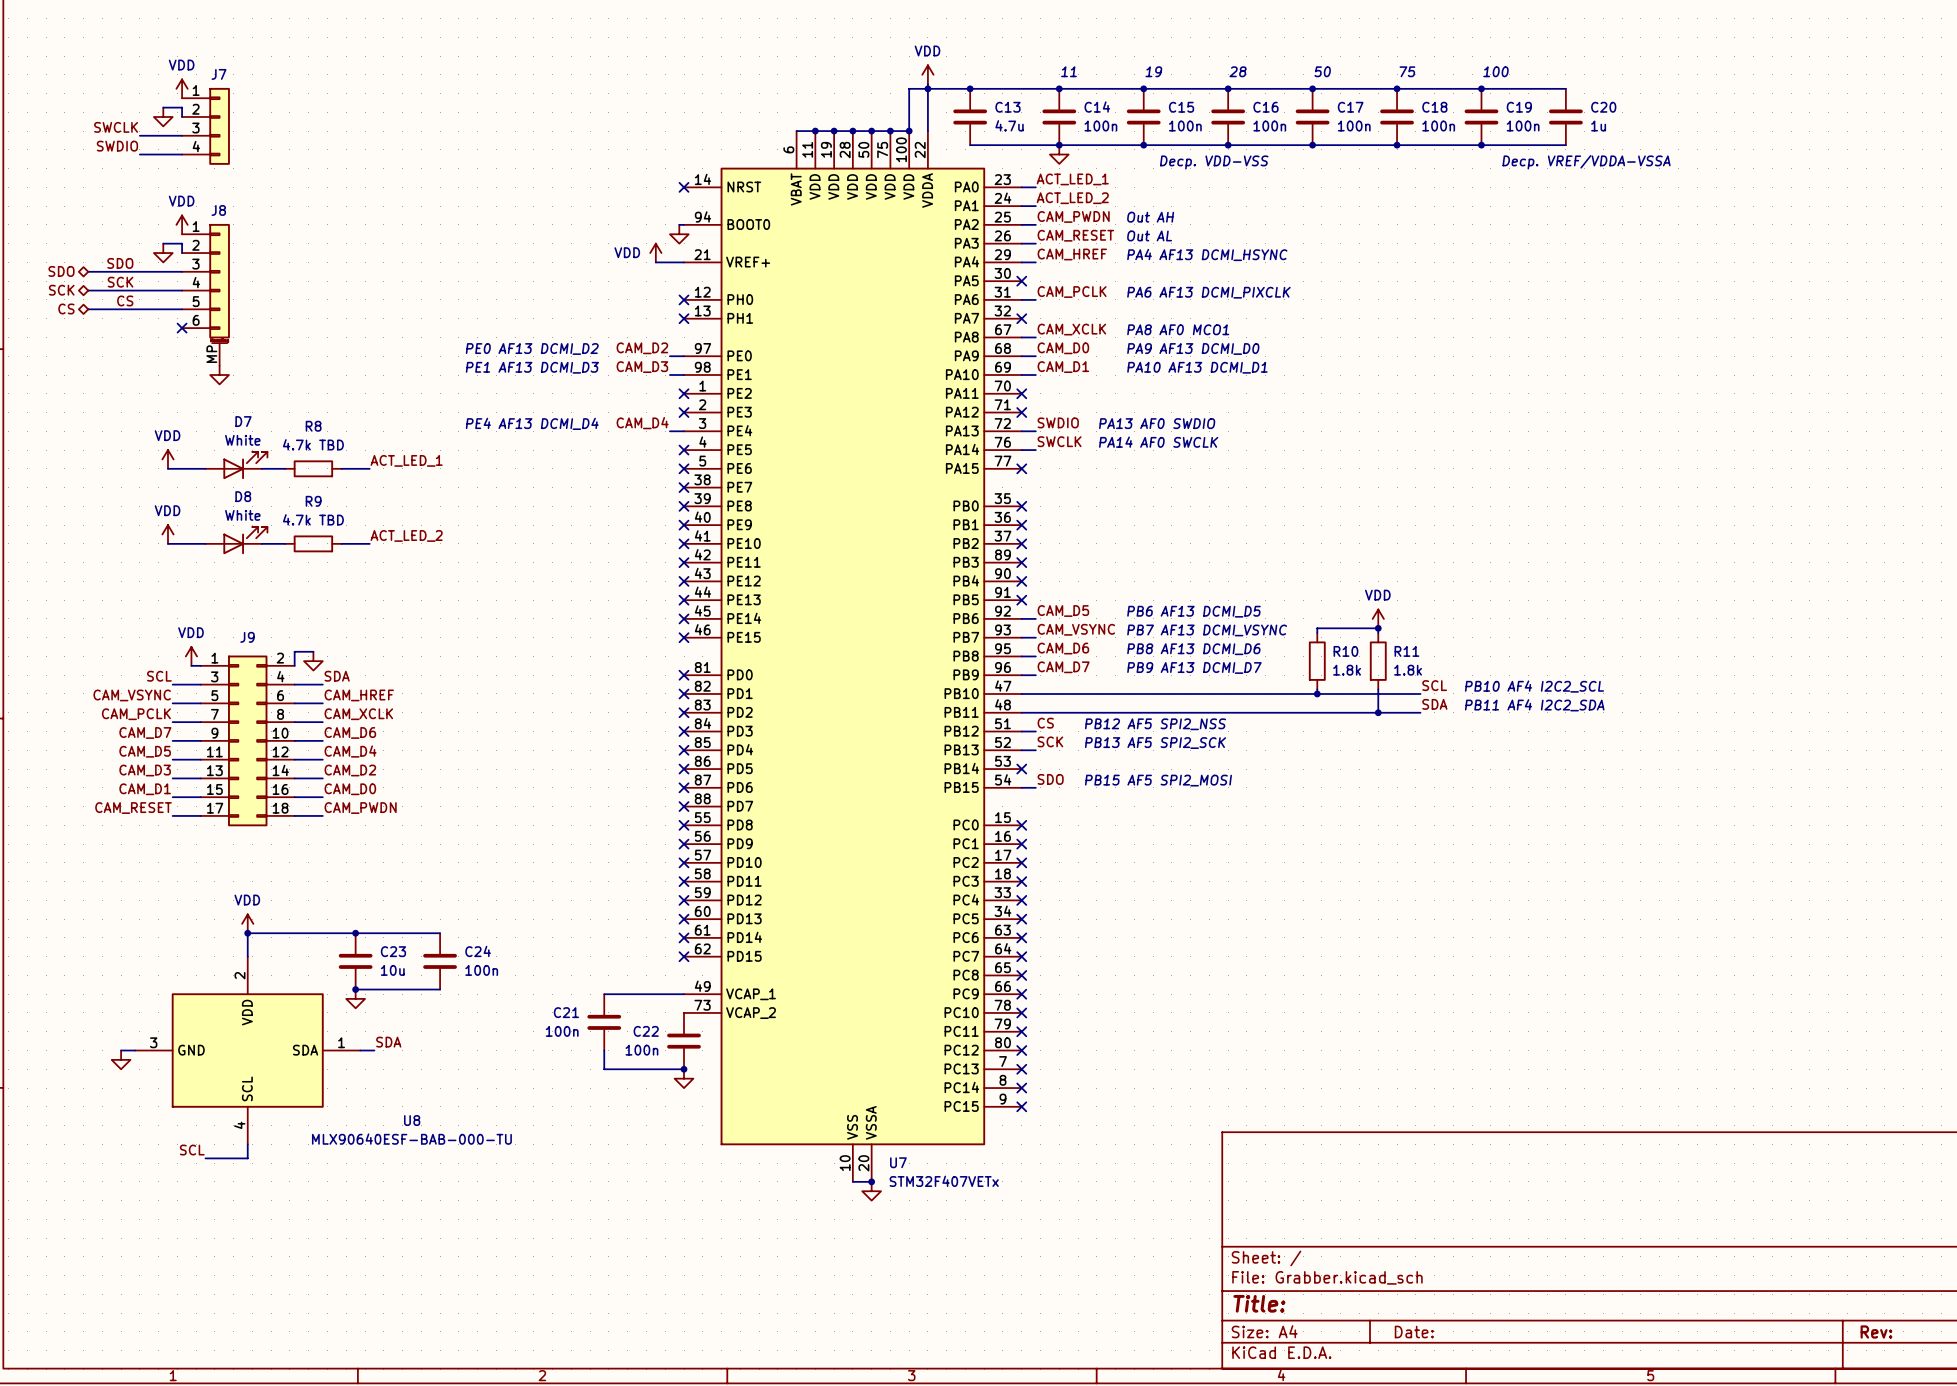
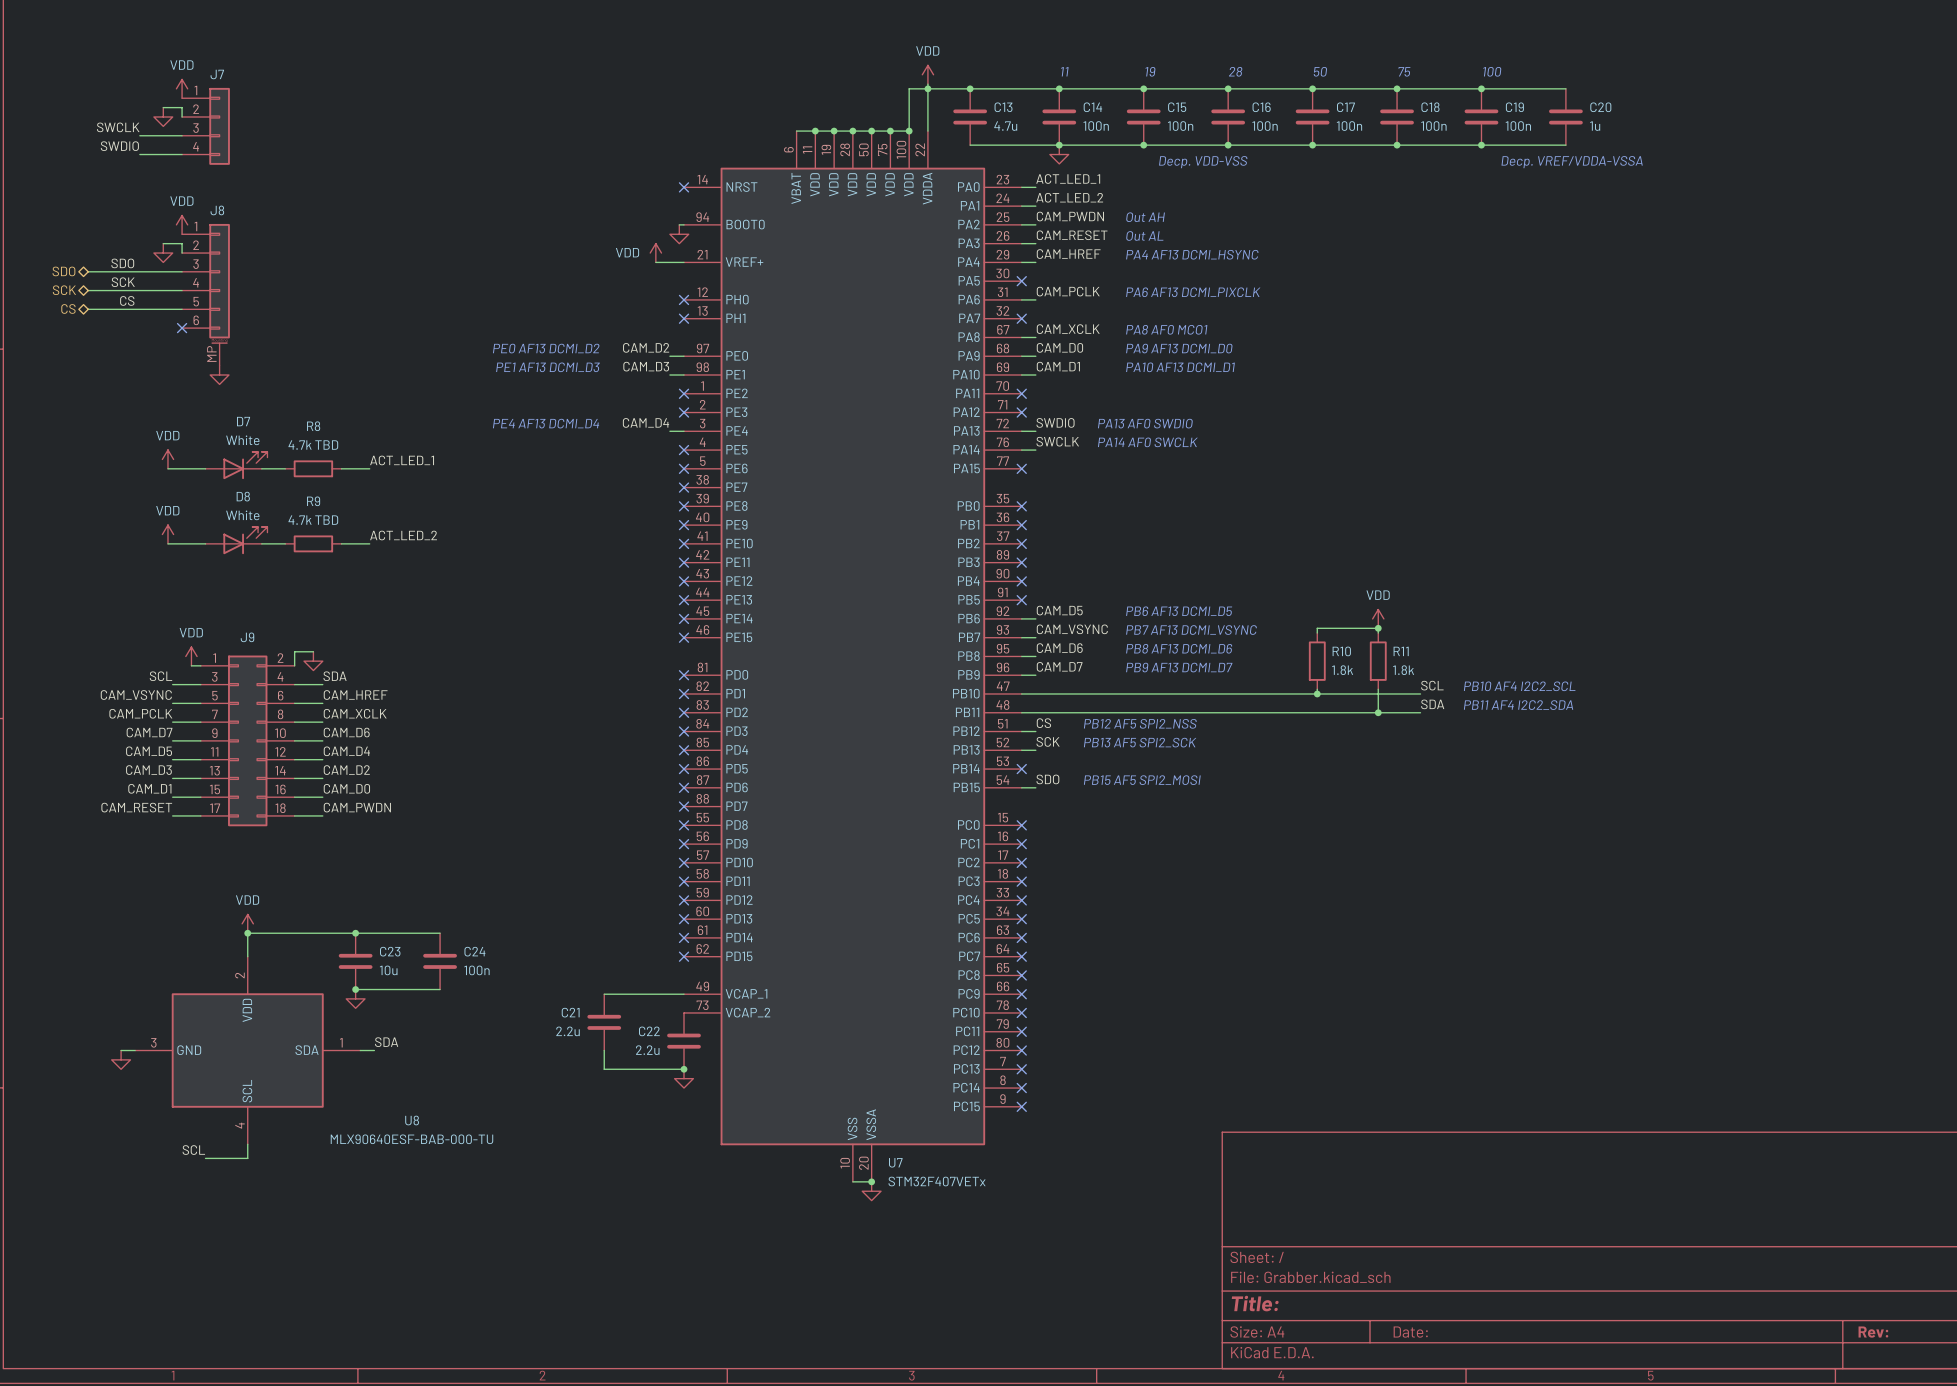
C21 value: 100n (562, 1031) -> 2.2u (568, 1031)
C22 value: 100n (641, 1050) -> 2.2u (647, 1050)

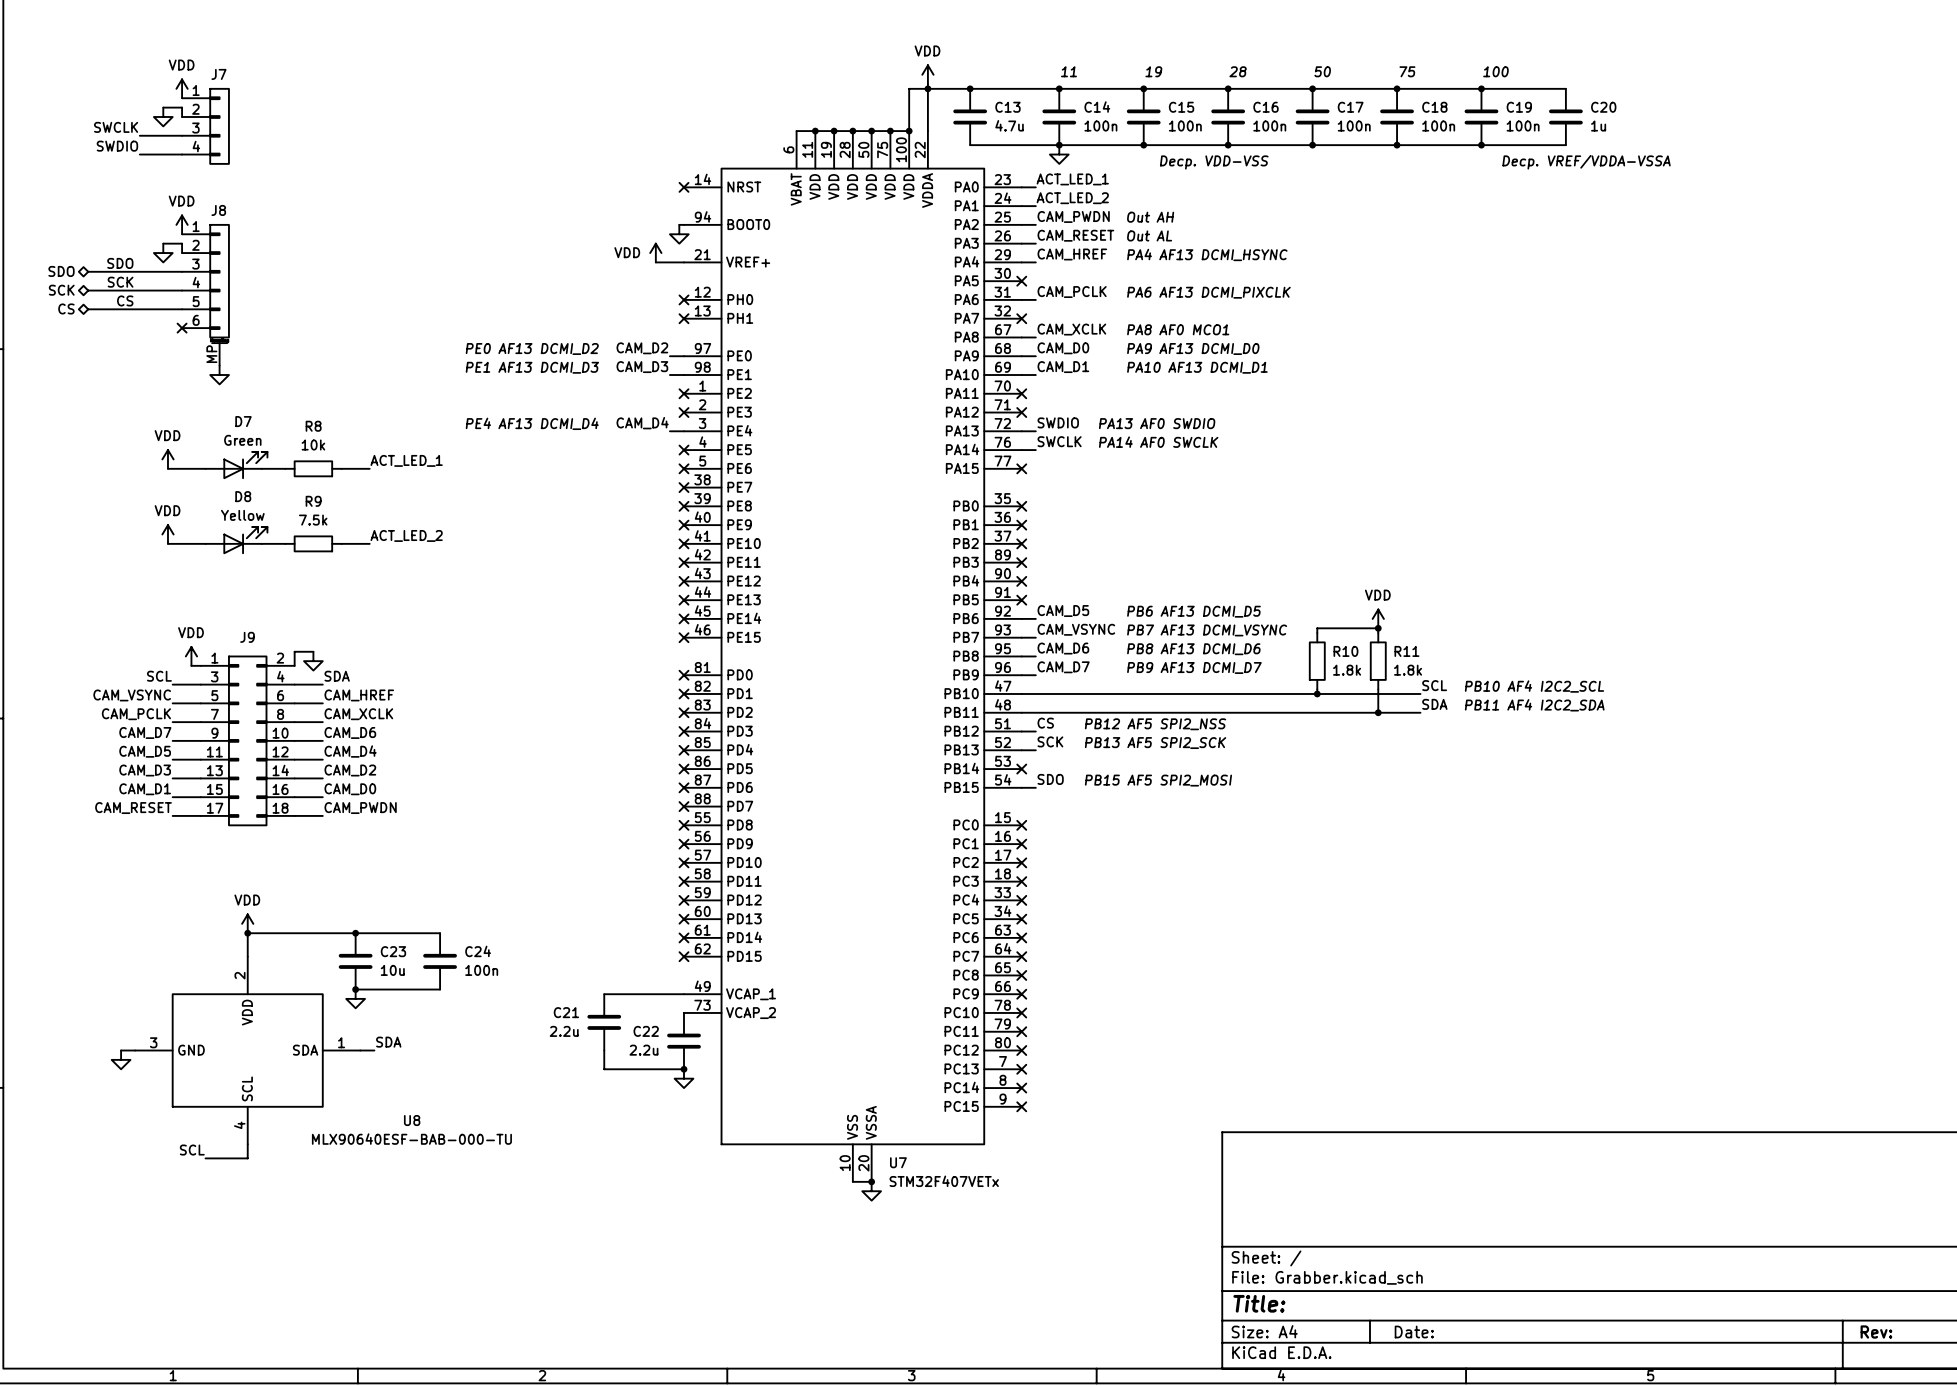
D7 value: White (242, 440) -> Green (242, 440)
R8 value: 4.7k TBD (313, 445) -> 10k (313, 445)
D8 value: White (242, 515) -> Yellow (242, 515)
R9 value: 4.7k TBD (313, 520) -> 7.5k (313, 520)

